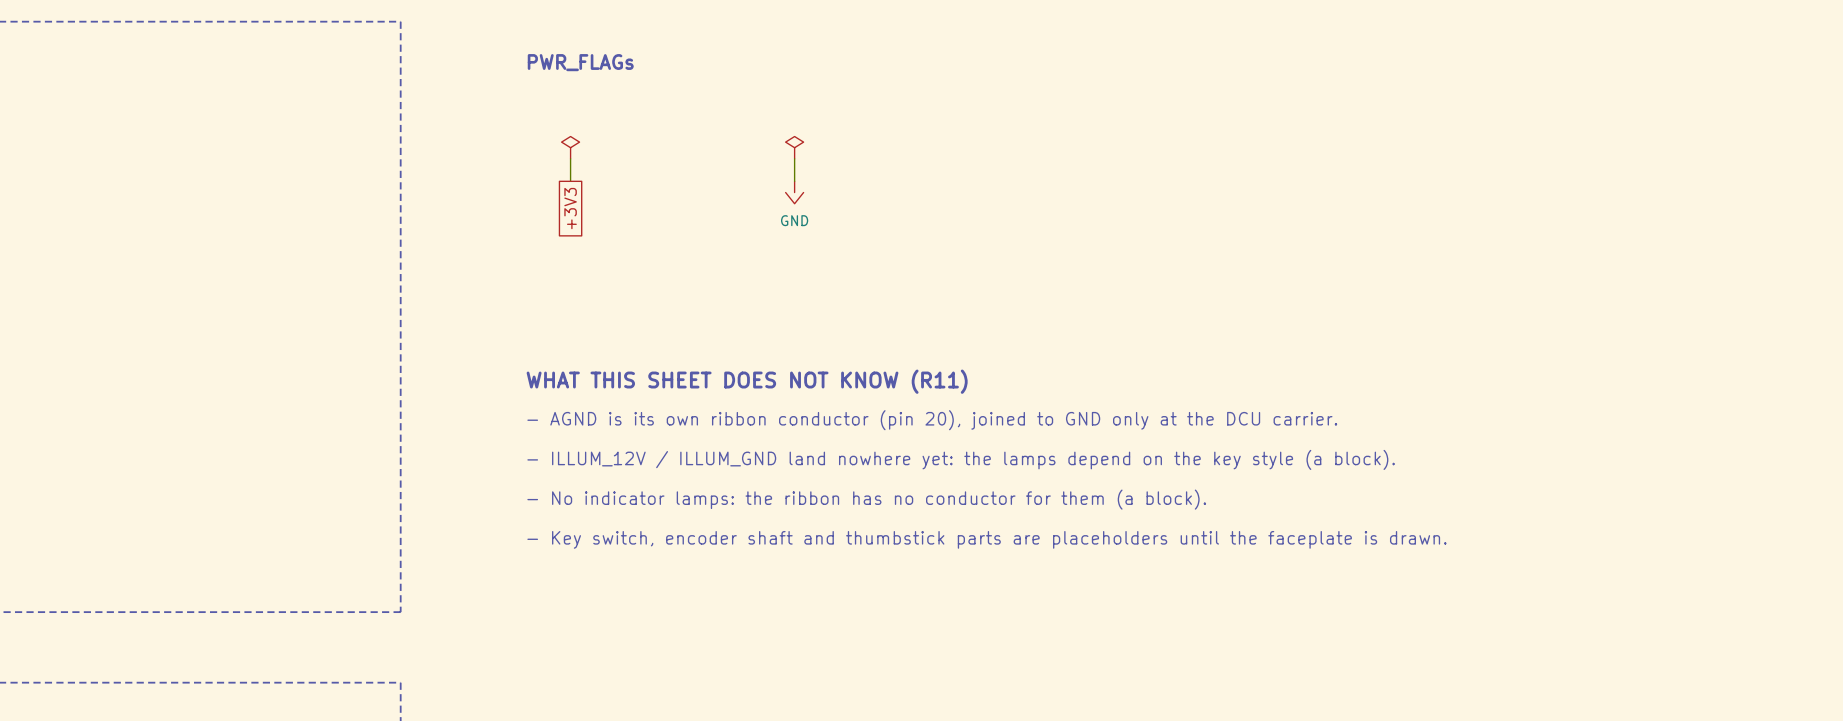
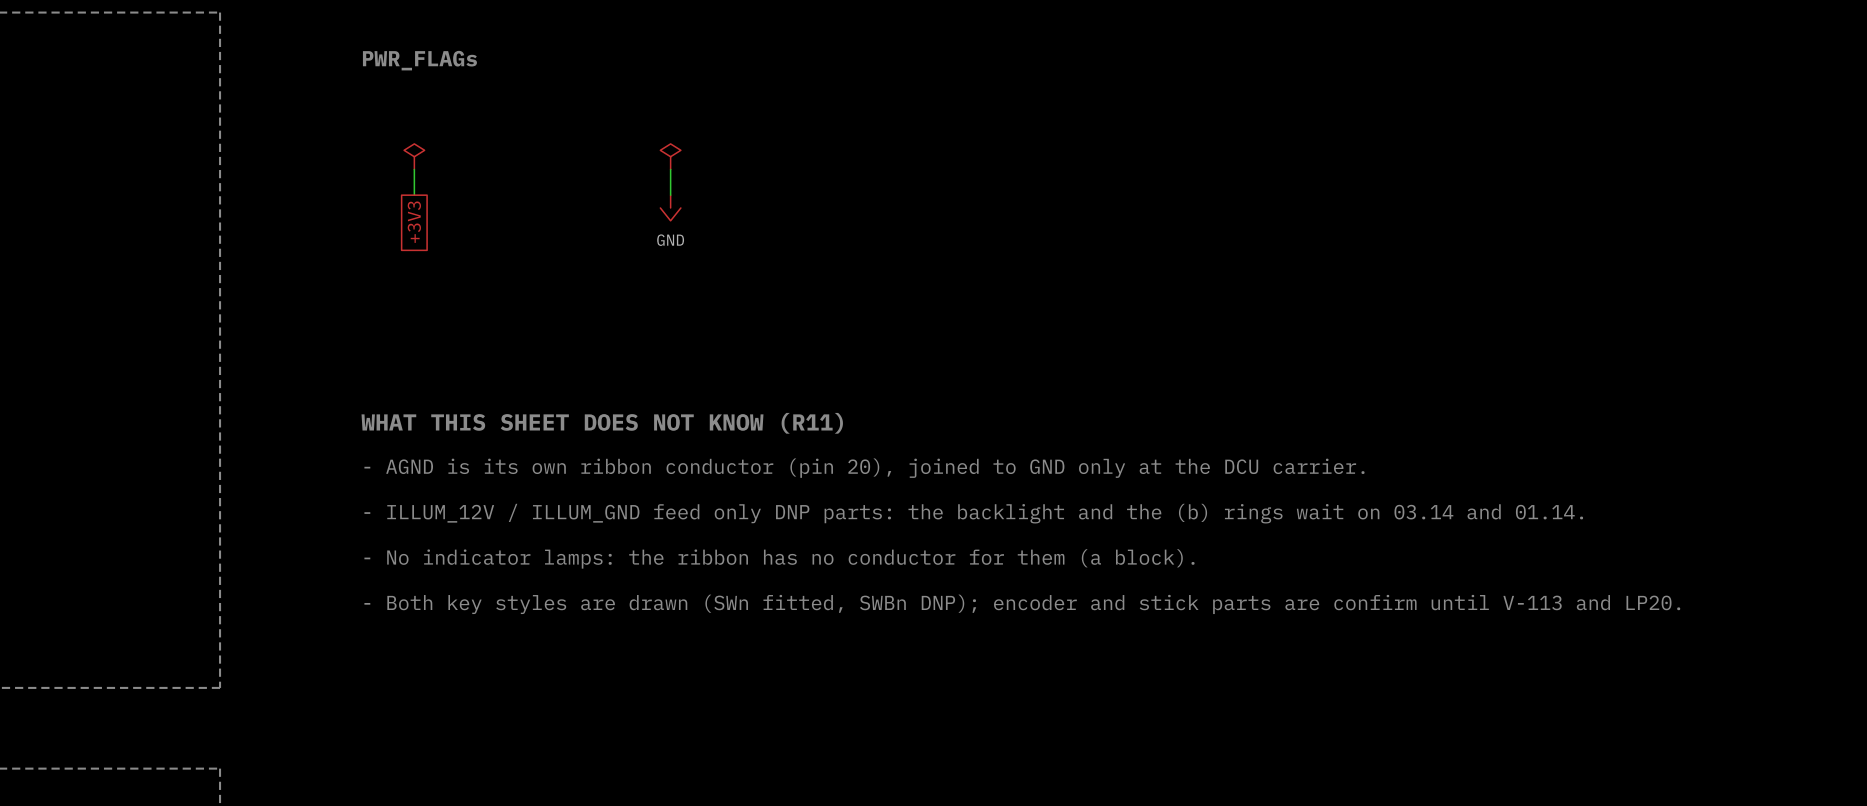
text: - ILLUM_12V / ILLUM_GND land nowhere yet: the lamps depend on the key style (a block). (961, 459) -> - ILLUM_12V / ILLUM_GND feed only DNP parts: the backlight and the (b) rings wait on 03.14 and 01.14. (973, 513)
text: - Key switch, encoder shaft and thumbstick parts are placeholders until the faceplate is drawn. (986, 539) -> - Both key styles are drawn (SWn fitted, SWBn DNP); encoder and stick parts are confirm until V-113 and LP20. (1022, 604)

